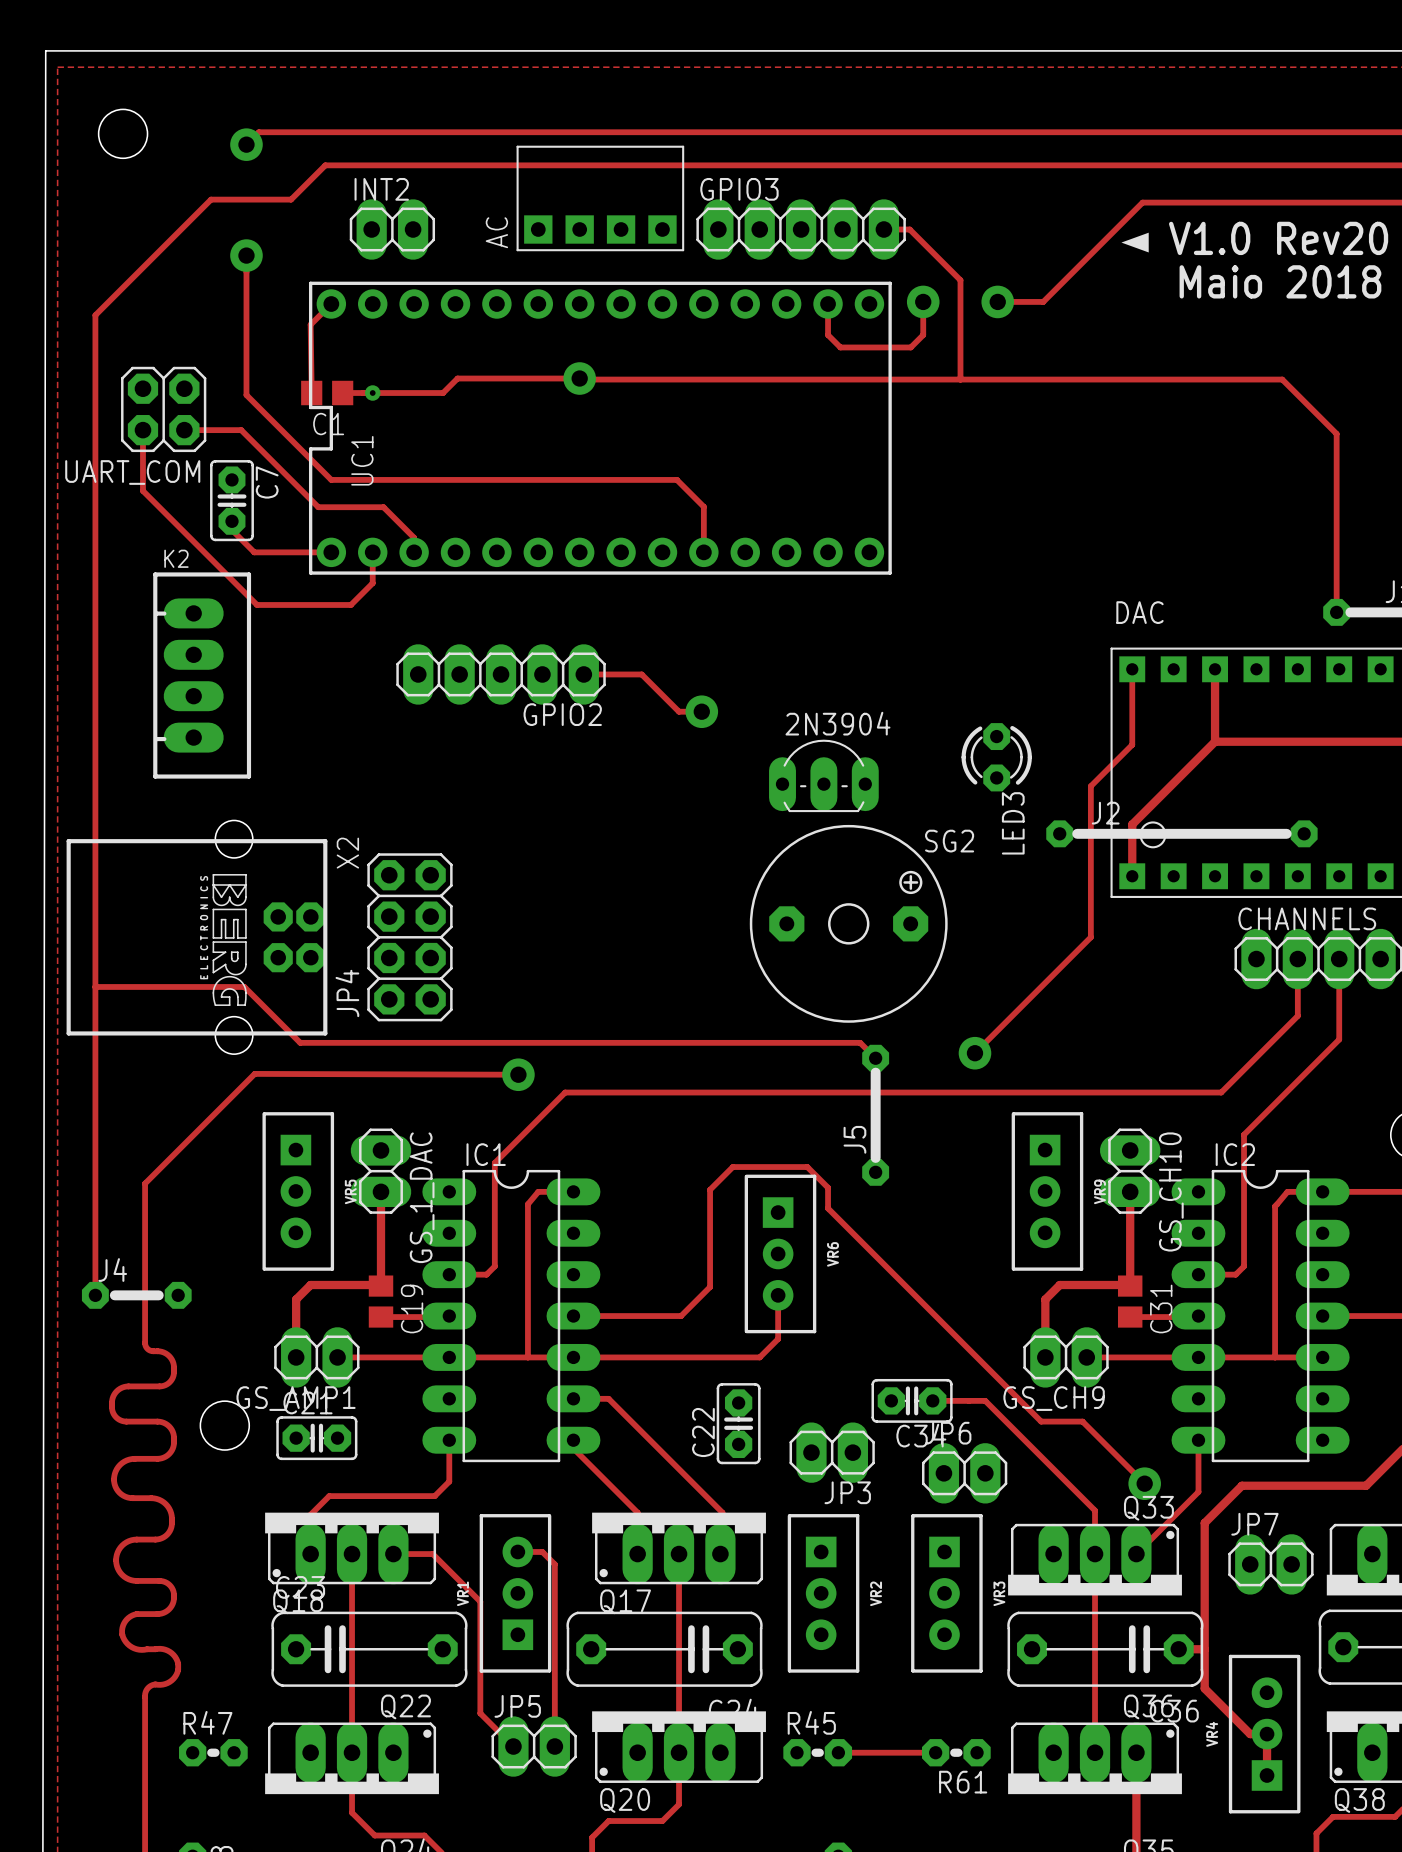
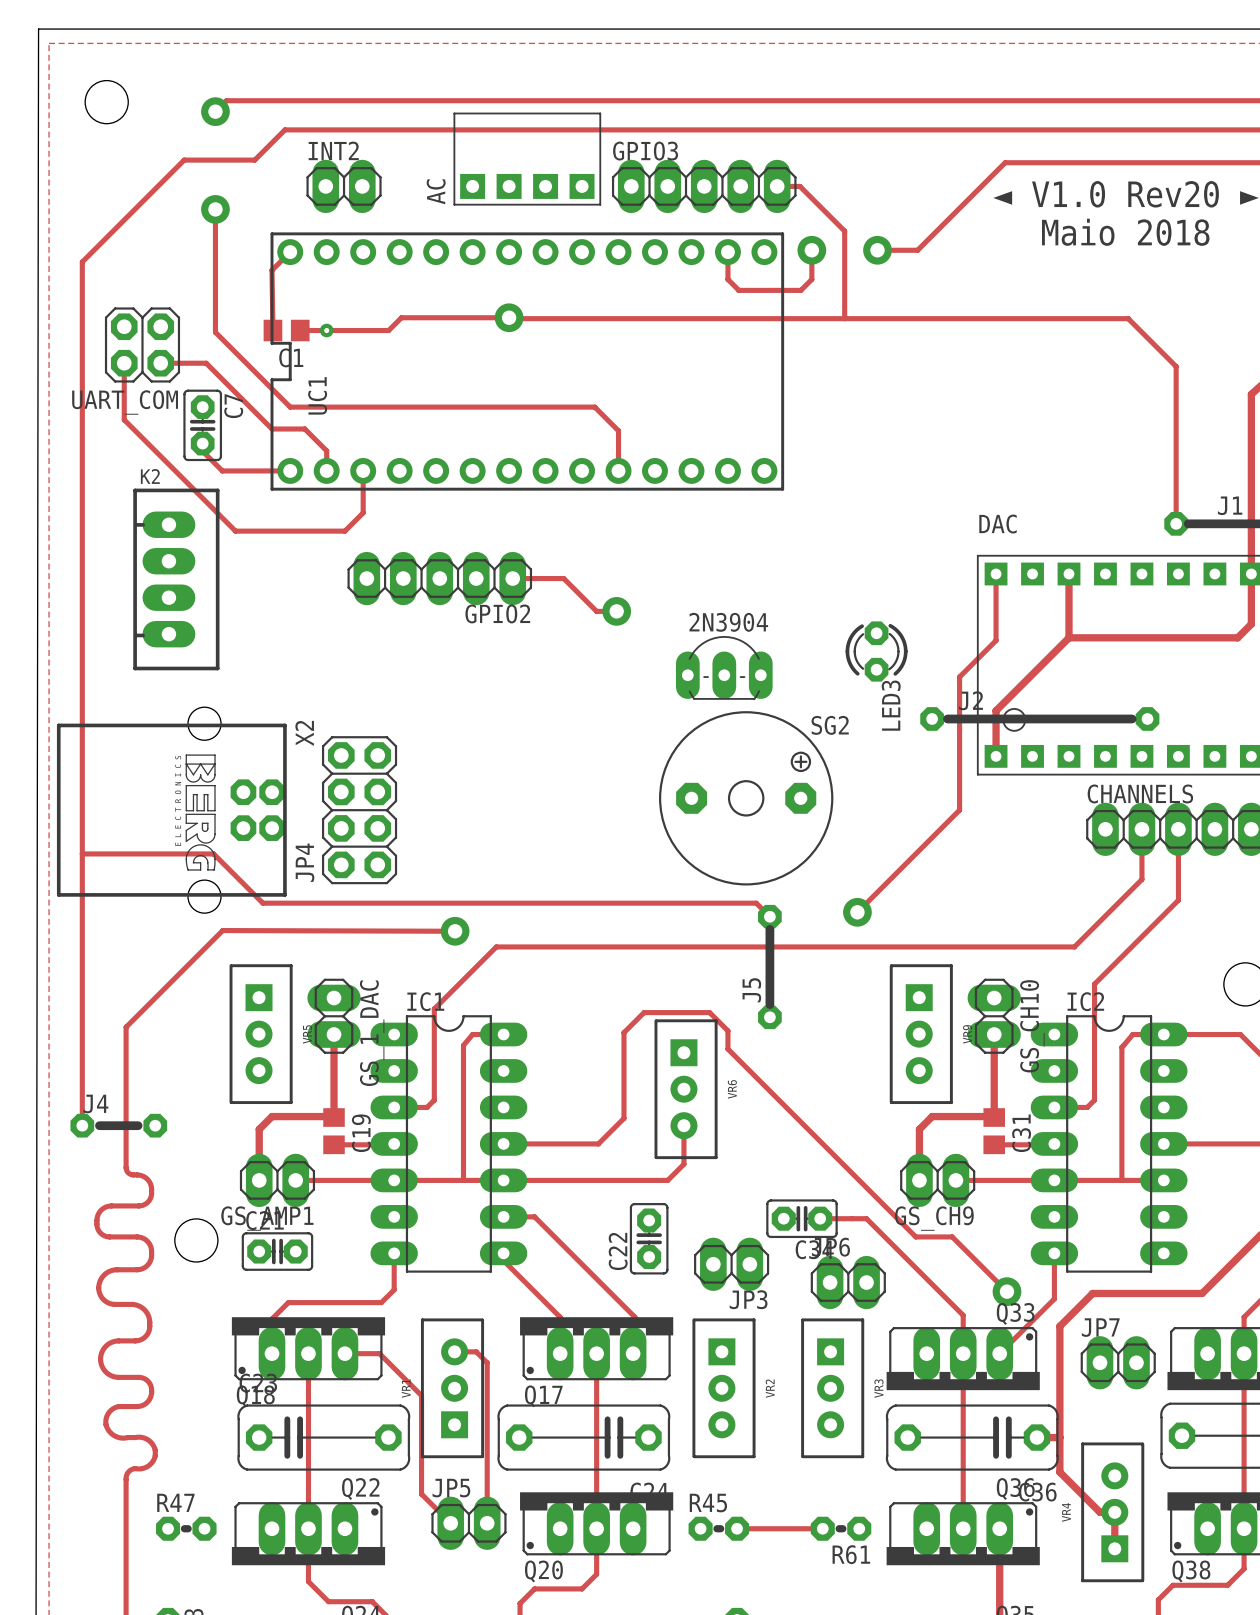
track: (236, 430) (241, 430) (318, 507) (383, 507) (414, 537) (414, 552) -> (206, 363) (272, 429) (304, 429) (326, 450) (326, 470)
track: (142, 490) (257, 604) (350, 604) (372, 583) (372, 552) -> (124, 416) (124, 419) (235, 531) (344, 531) (363, 512) (363, 470)

